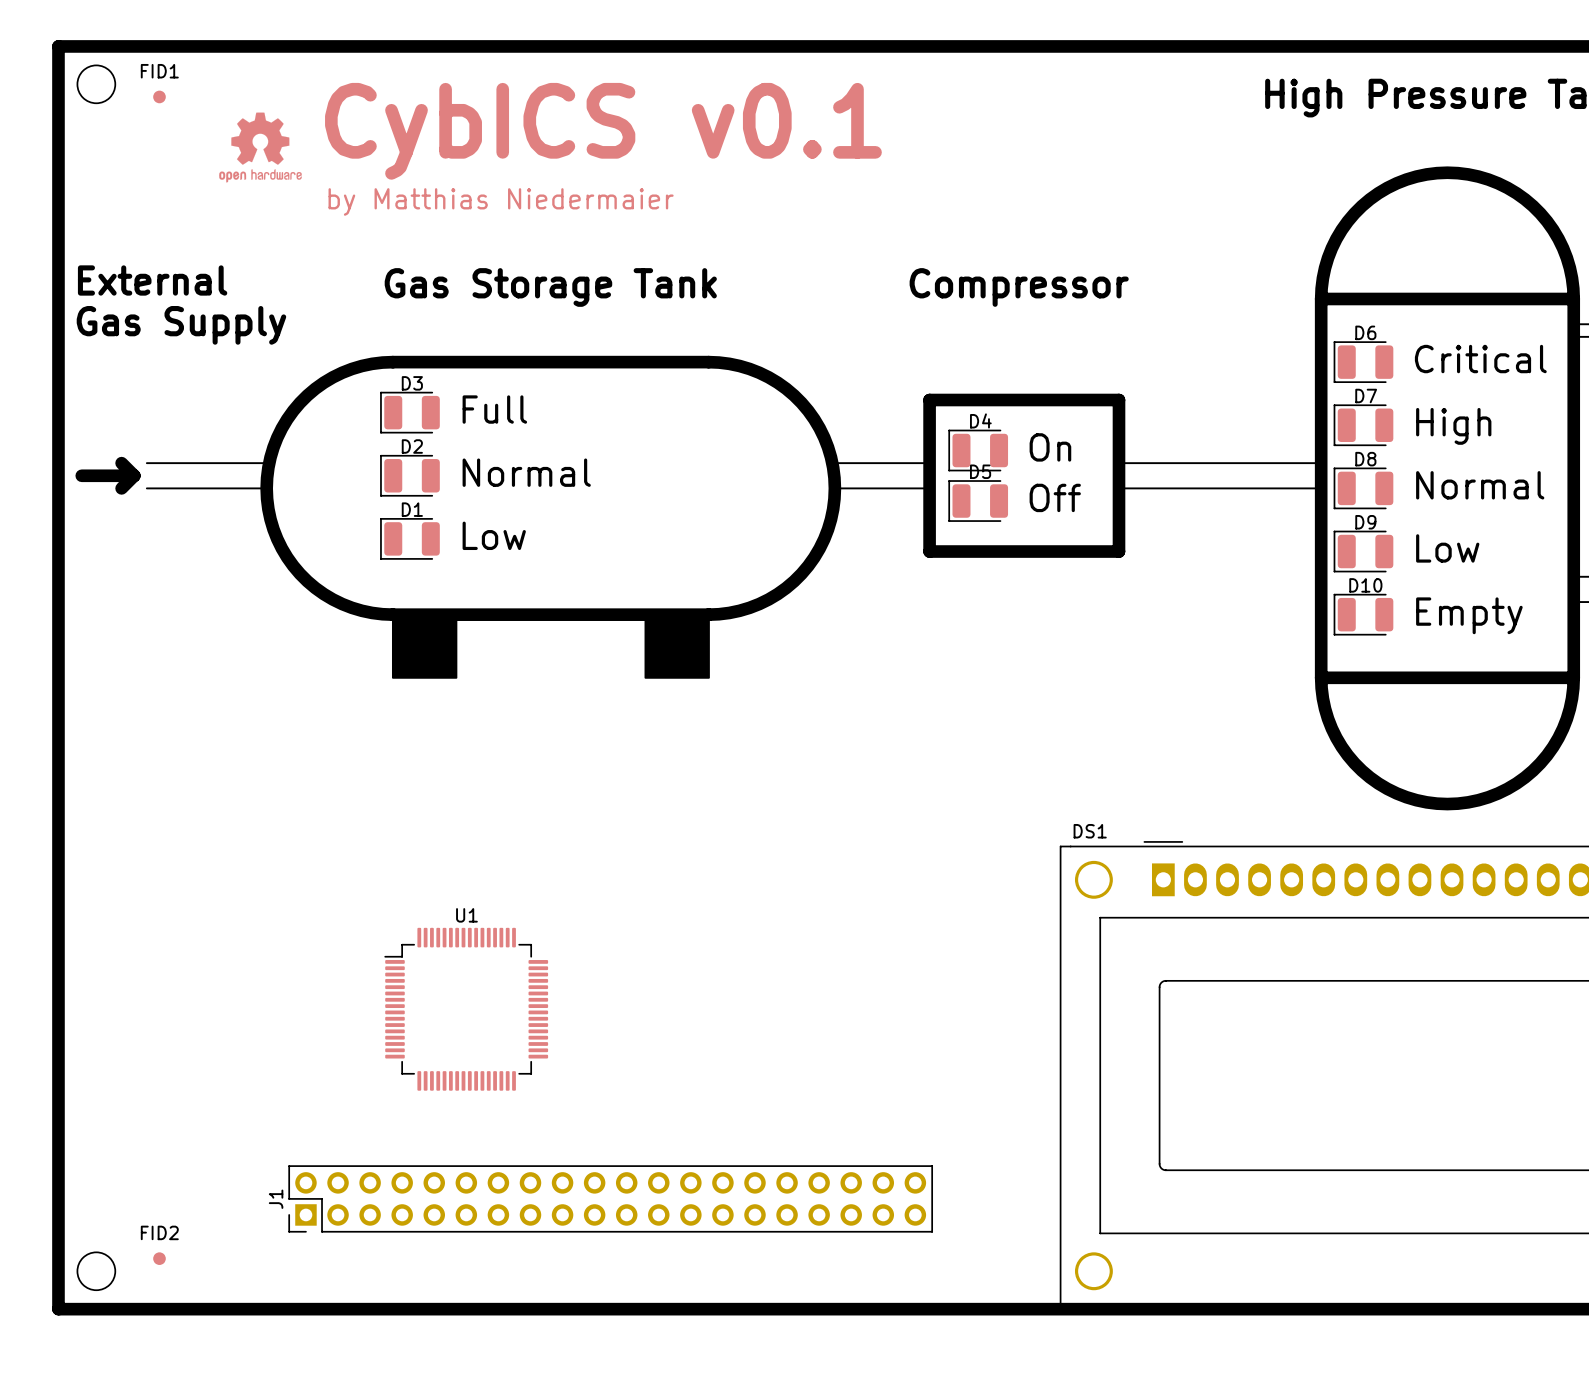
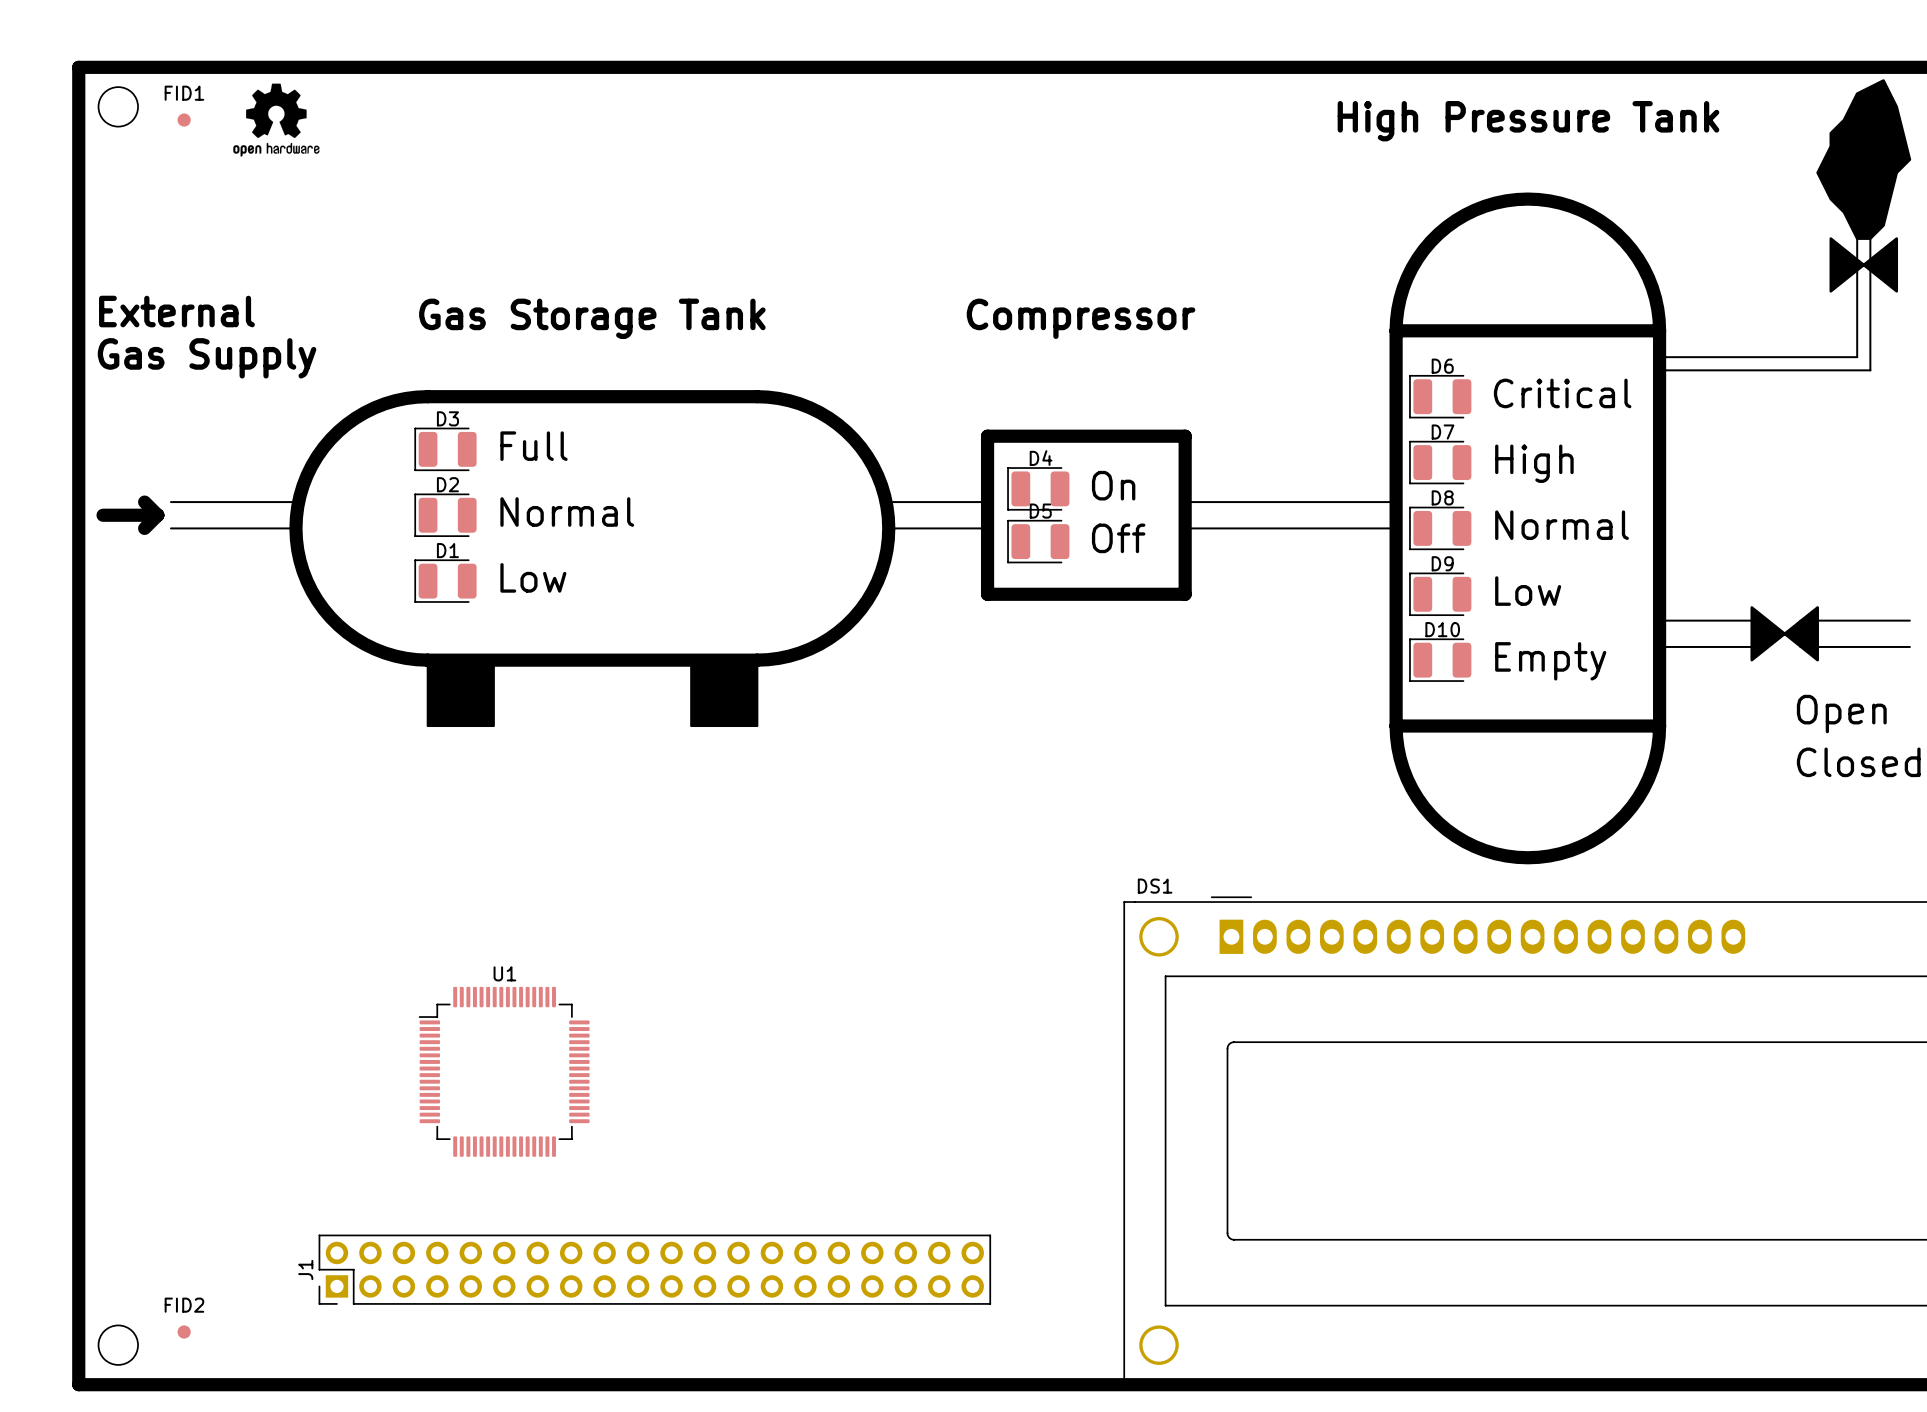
drawing: none -> [233, 83, 320, 157]
drawing: [219, 112, 302, 183] -> none
text: CybICS v0.1 (603, 131) -> none
text: by Matthias Niedermaier (501, 201) -> none

